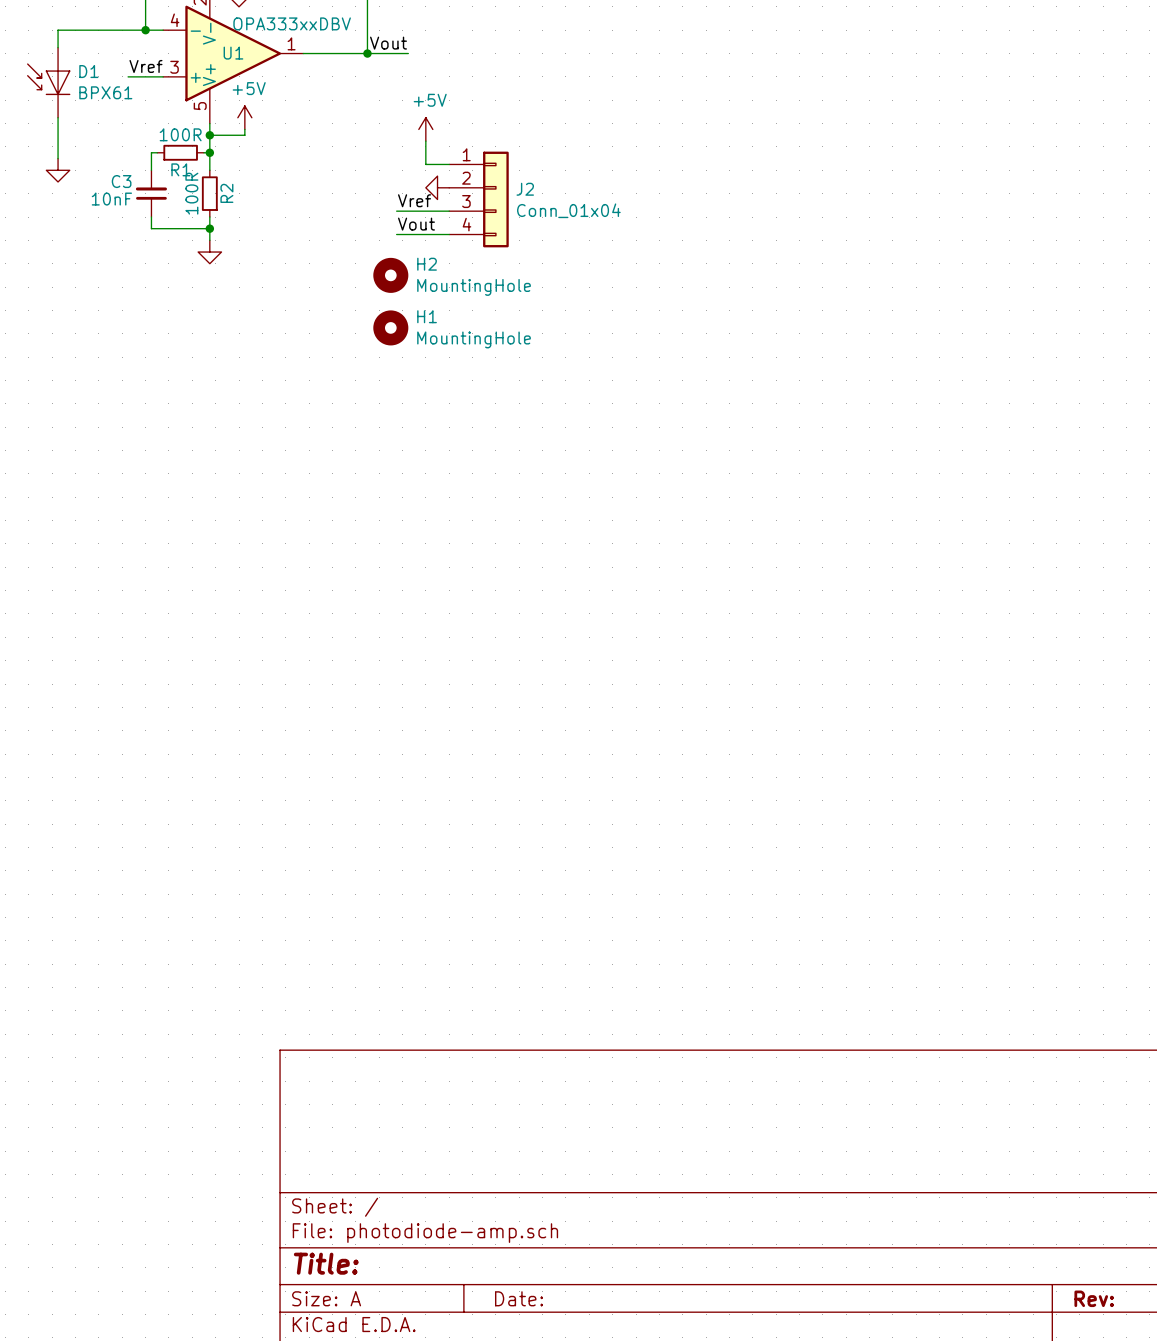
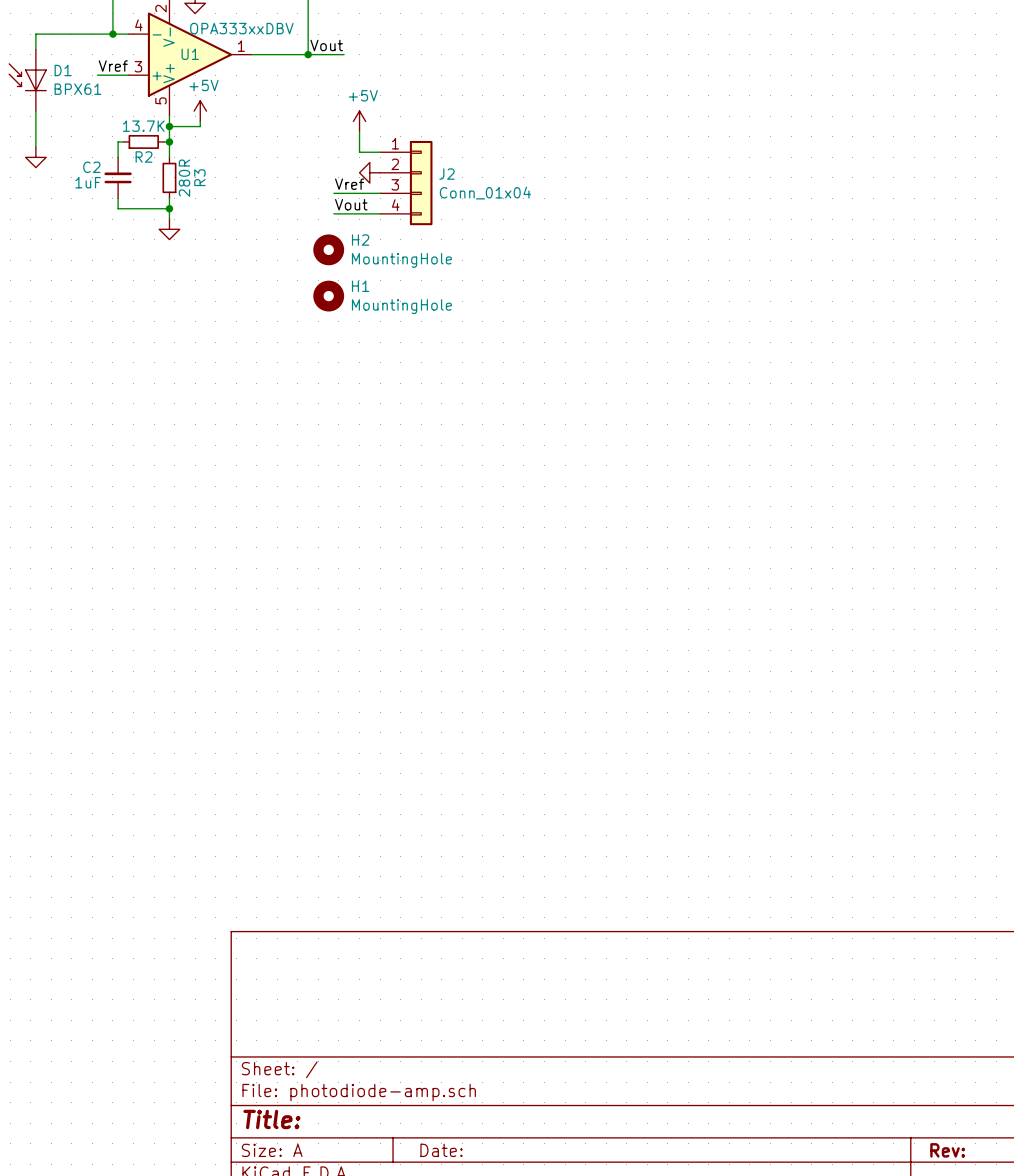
R1 value: 100R (180, 134) -> 13.7K (143, 126)
R1 name: R1 (180, 169) -> R2 (144, 157)
C3 name: C3 (121, 181) -> C2 (91, 167)
R2 value: 100R (191, 193) -> 280R (184, 178)
R2 name: R2 (226, 193) -> R3 (199, 177)
C3 value: 10nF (111, 199) -> 1uF (88, 182)

